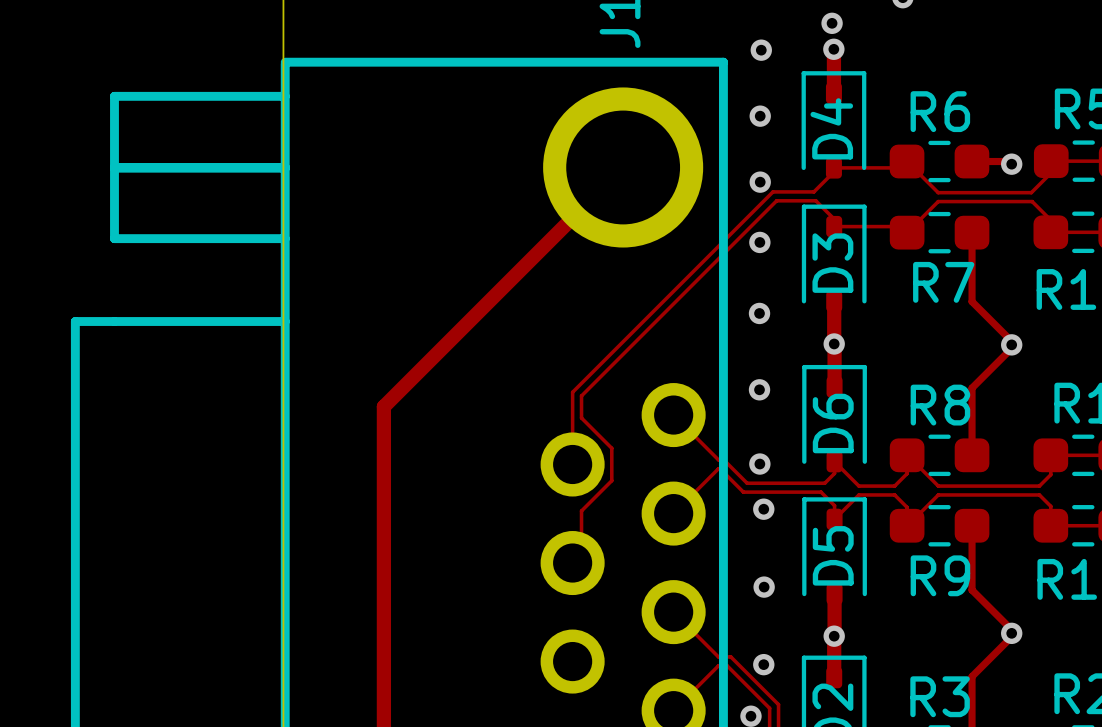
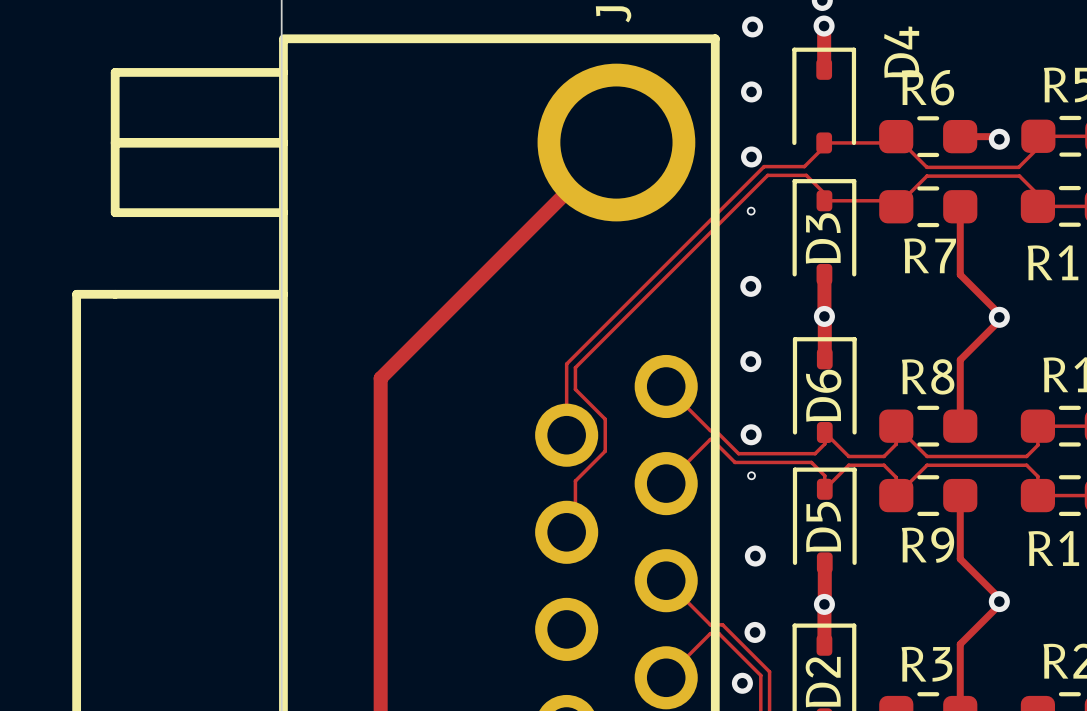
D4 name position: D4 (831, 128) -> D4 (901, 52)
via size: [749, 231, 771, 254] -> [746, 206, 756, 216]
via size: [753, 498, 775, 520] -> [747, 471, 756, 481]

